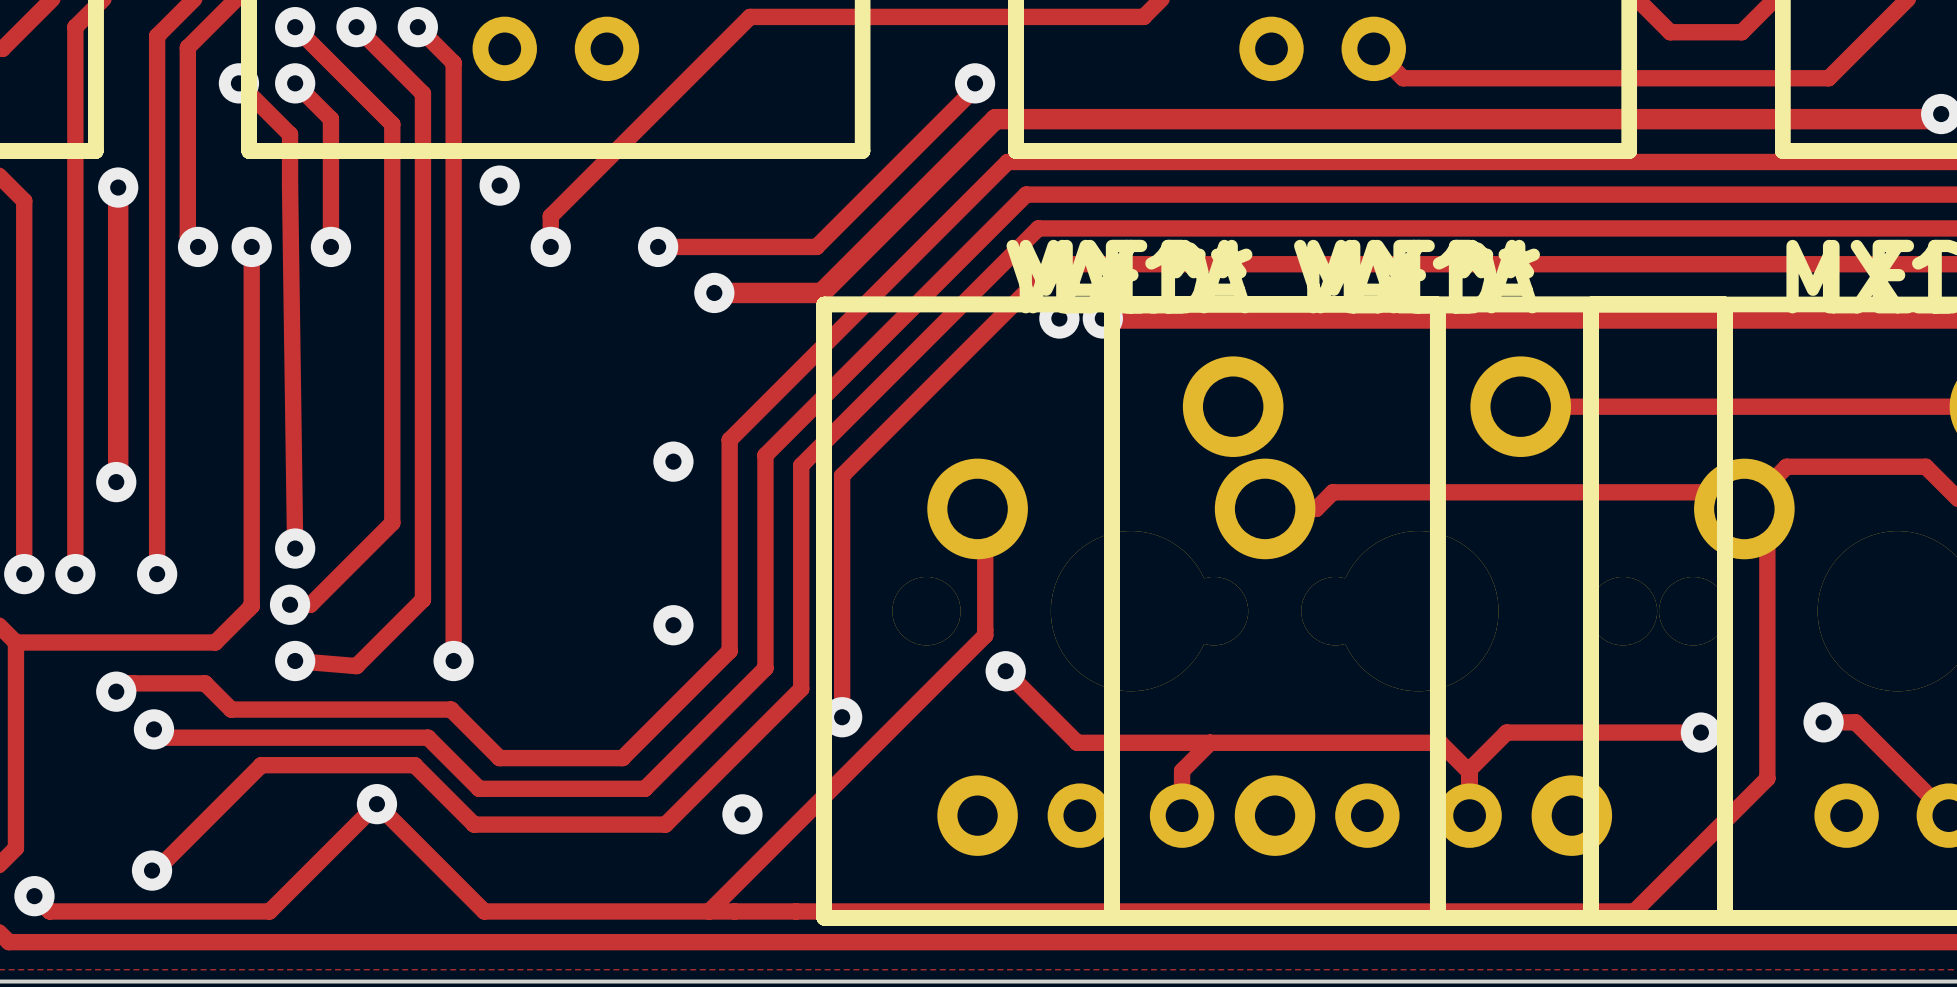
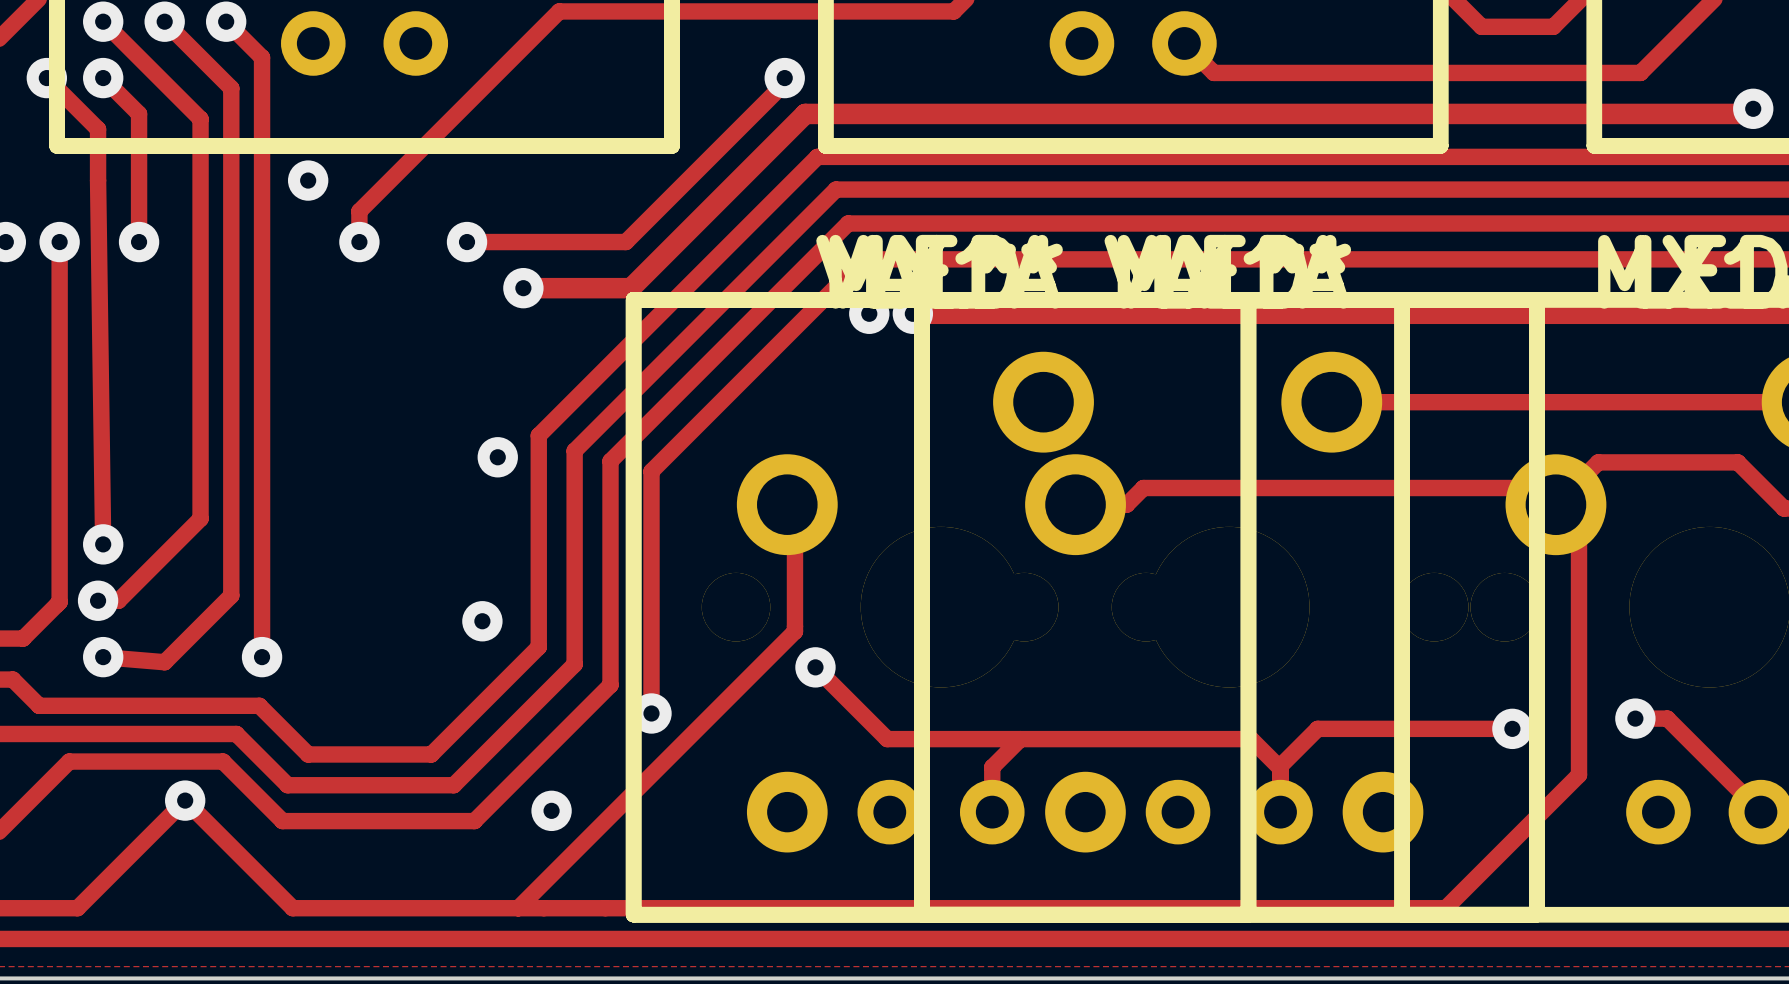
via position: (673, 461) -> (497, 457)

